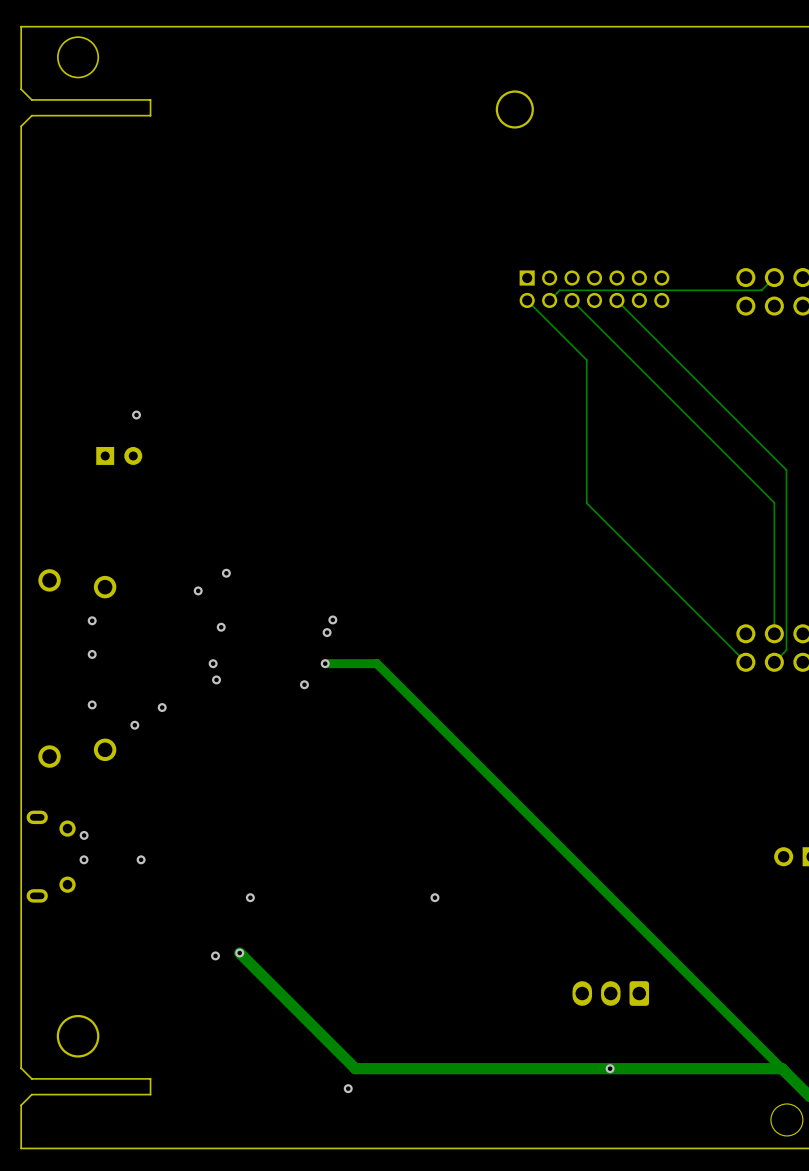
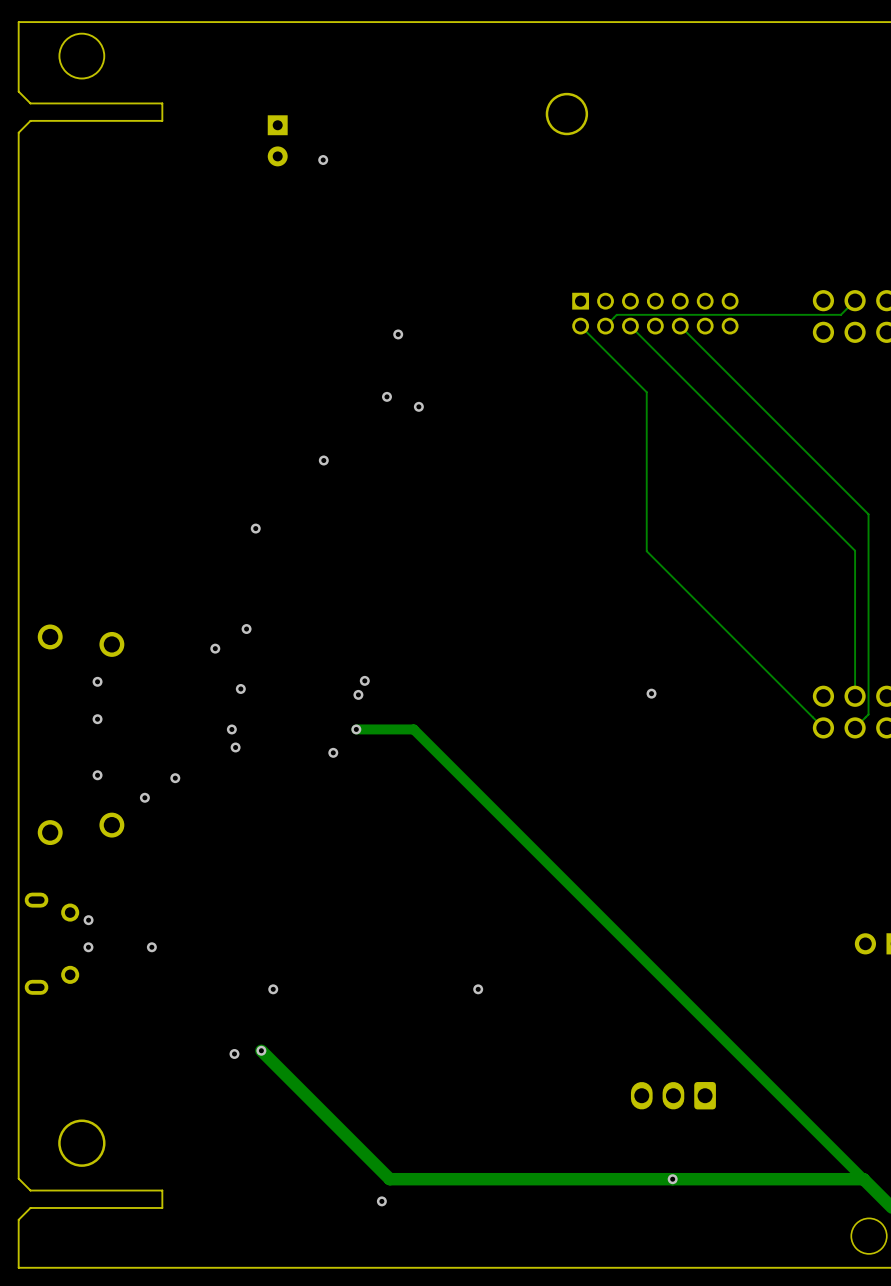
part: none -> (277, 140)
via: none -> (323, 160)
via: none -> (398, 334)
via: none -> (386, 396)
via: none -> (418, 406)
via: (136, 415) -> none
via: none -> (323, 460)
part: (119, 455) -> none
via: none -> (255, 528)
via: none -> (651, 693)

